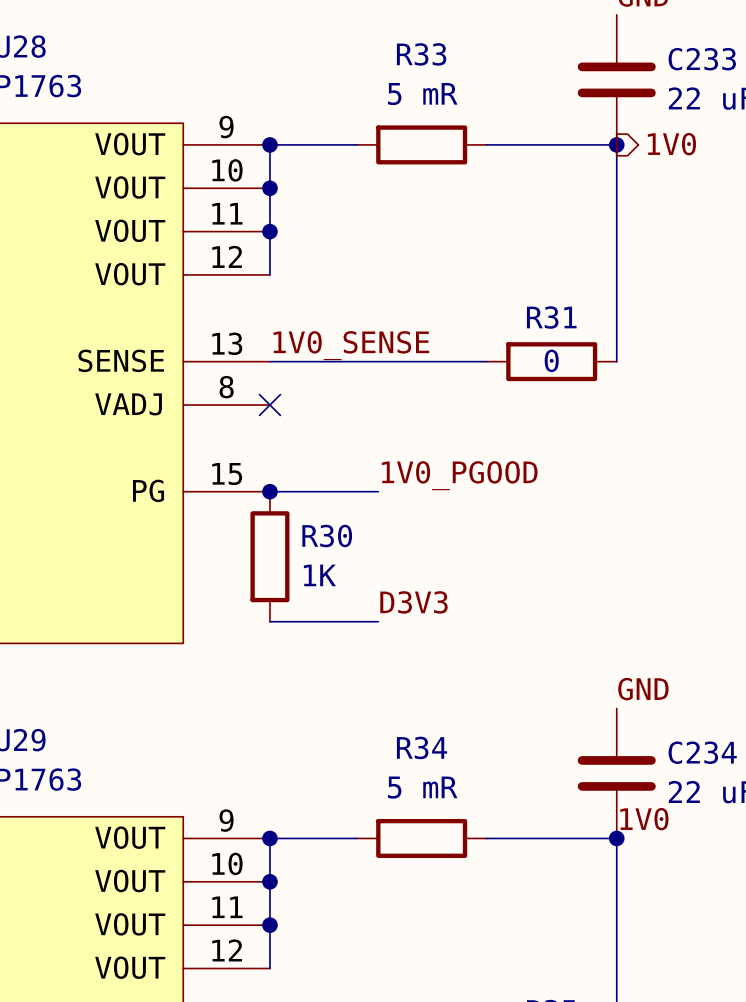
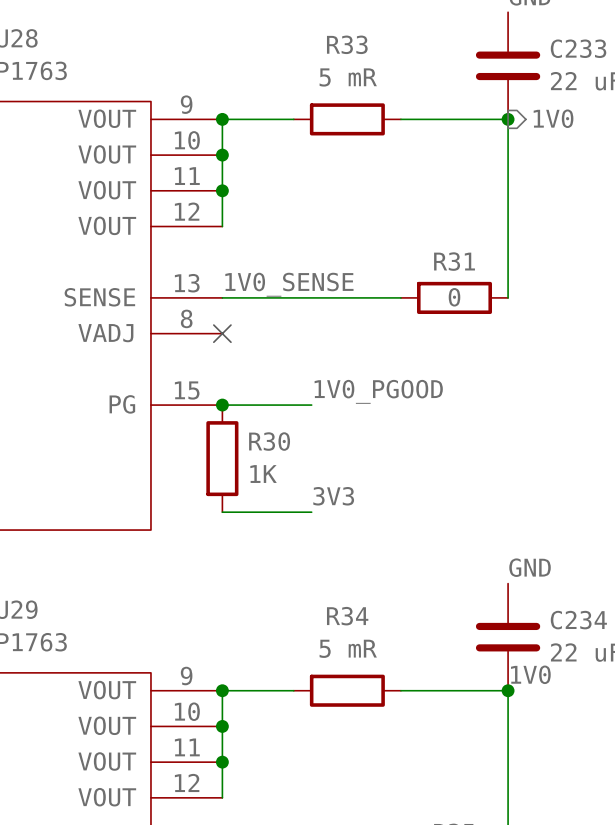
label: D3V3 (414, 602) -> 3V3 (333, 496)

